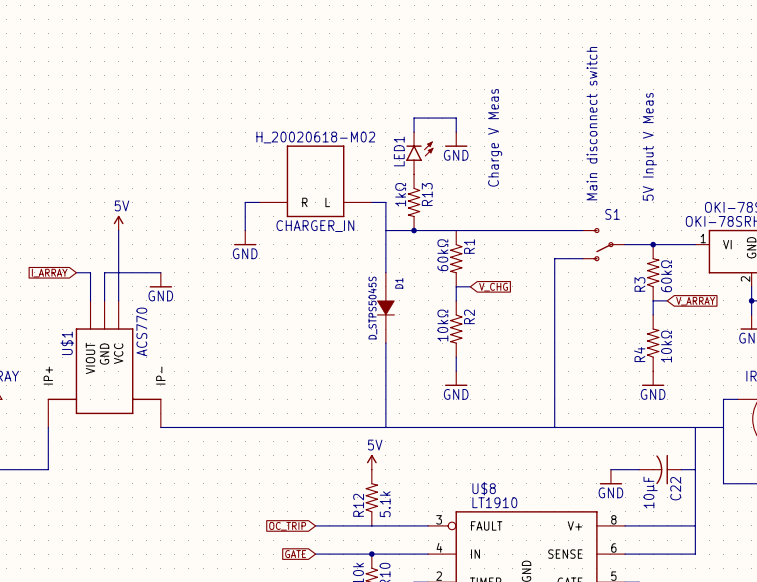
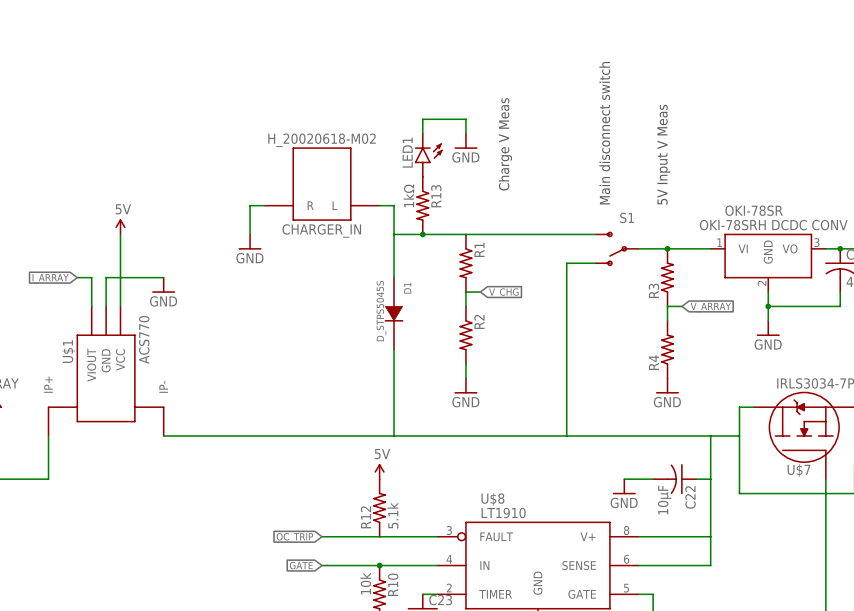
R1 value: 60kΩ (442, 255) -> none
R3 value: 60kΩ (666, 276) -> none
R2 value: 10kΩ (442, 325) -> none
R4 value: 10kΩ (666, 346) -> none

